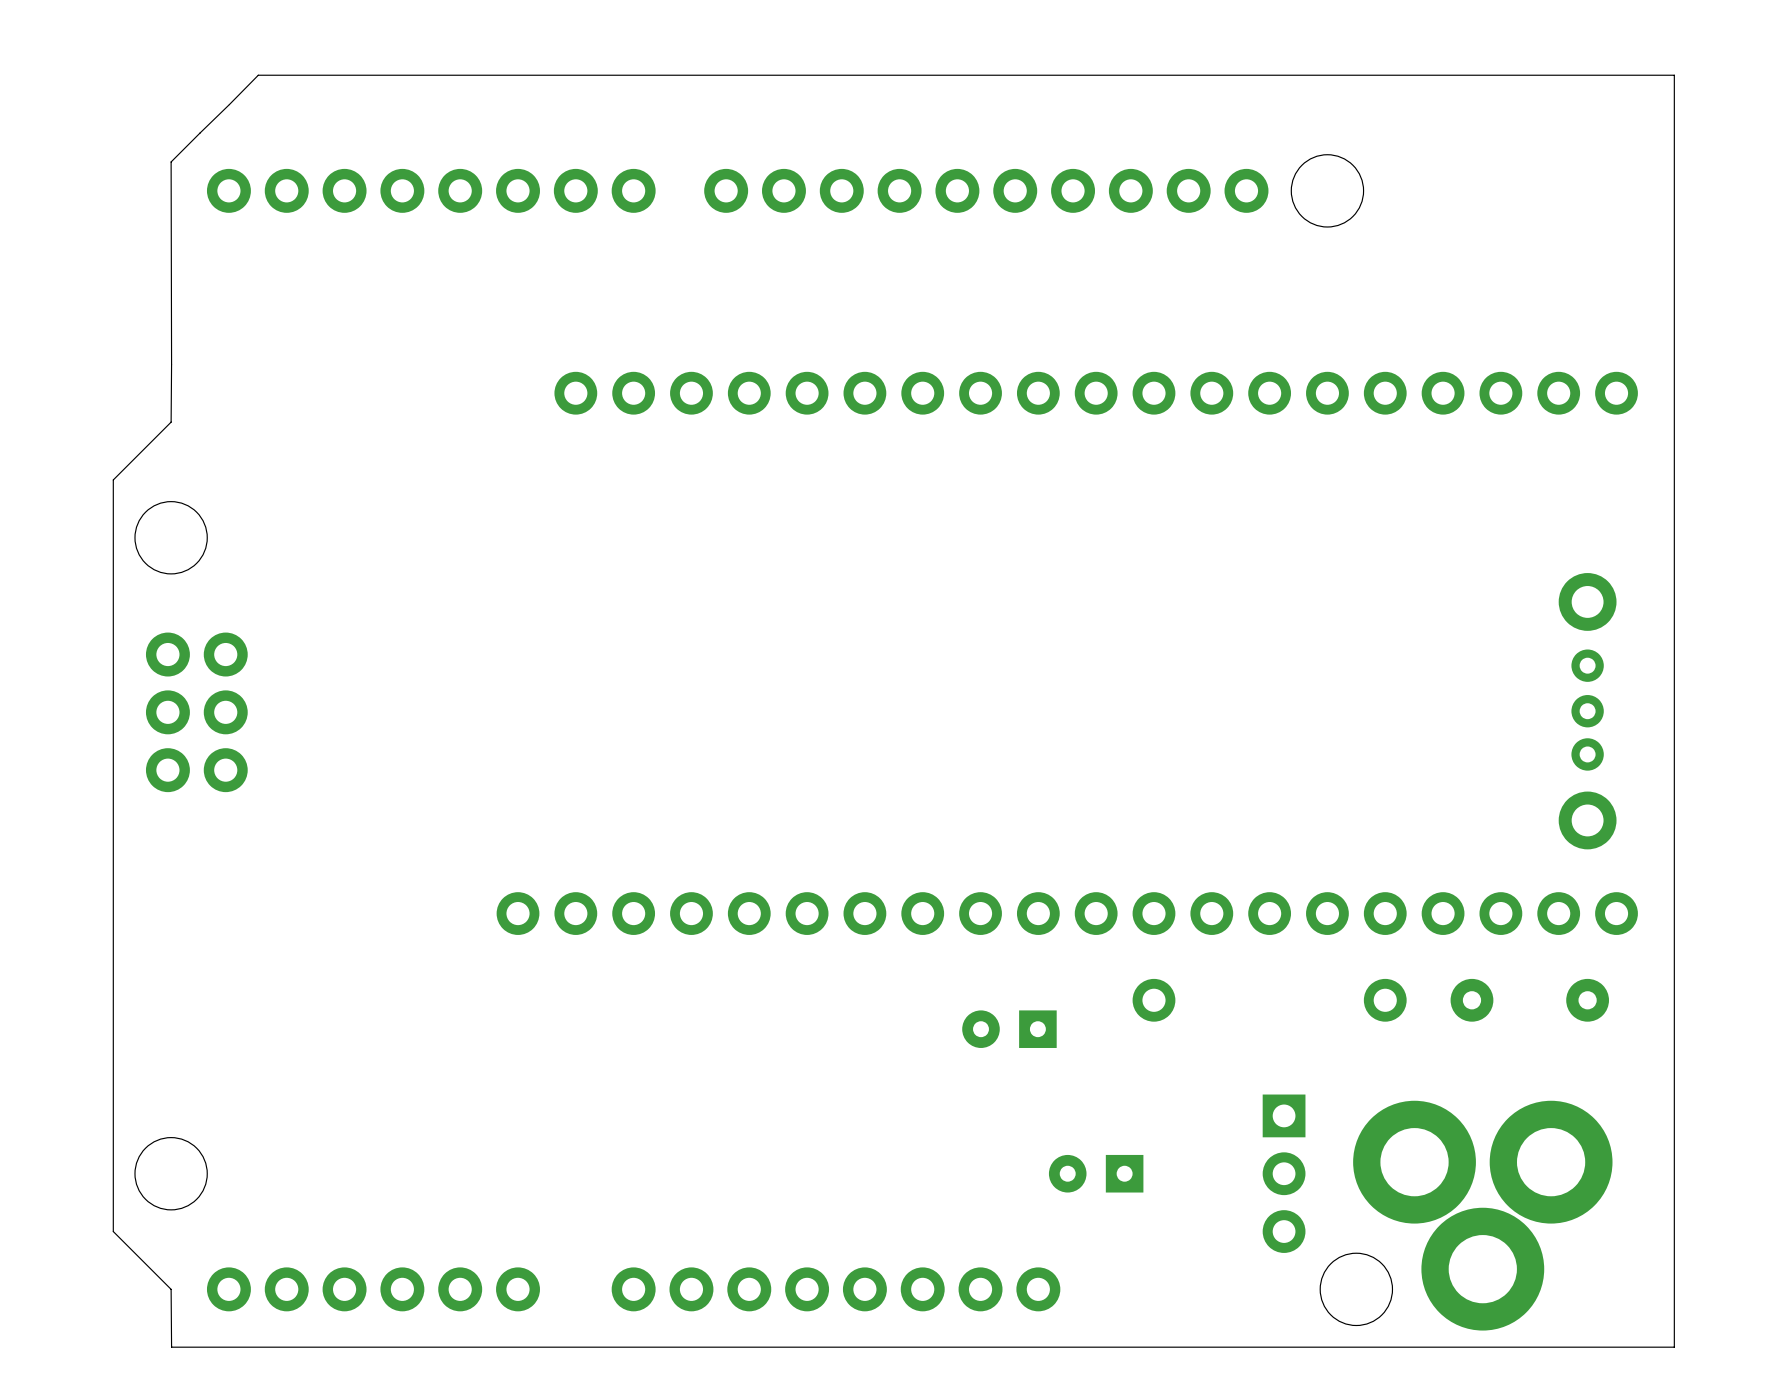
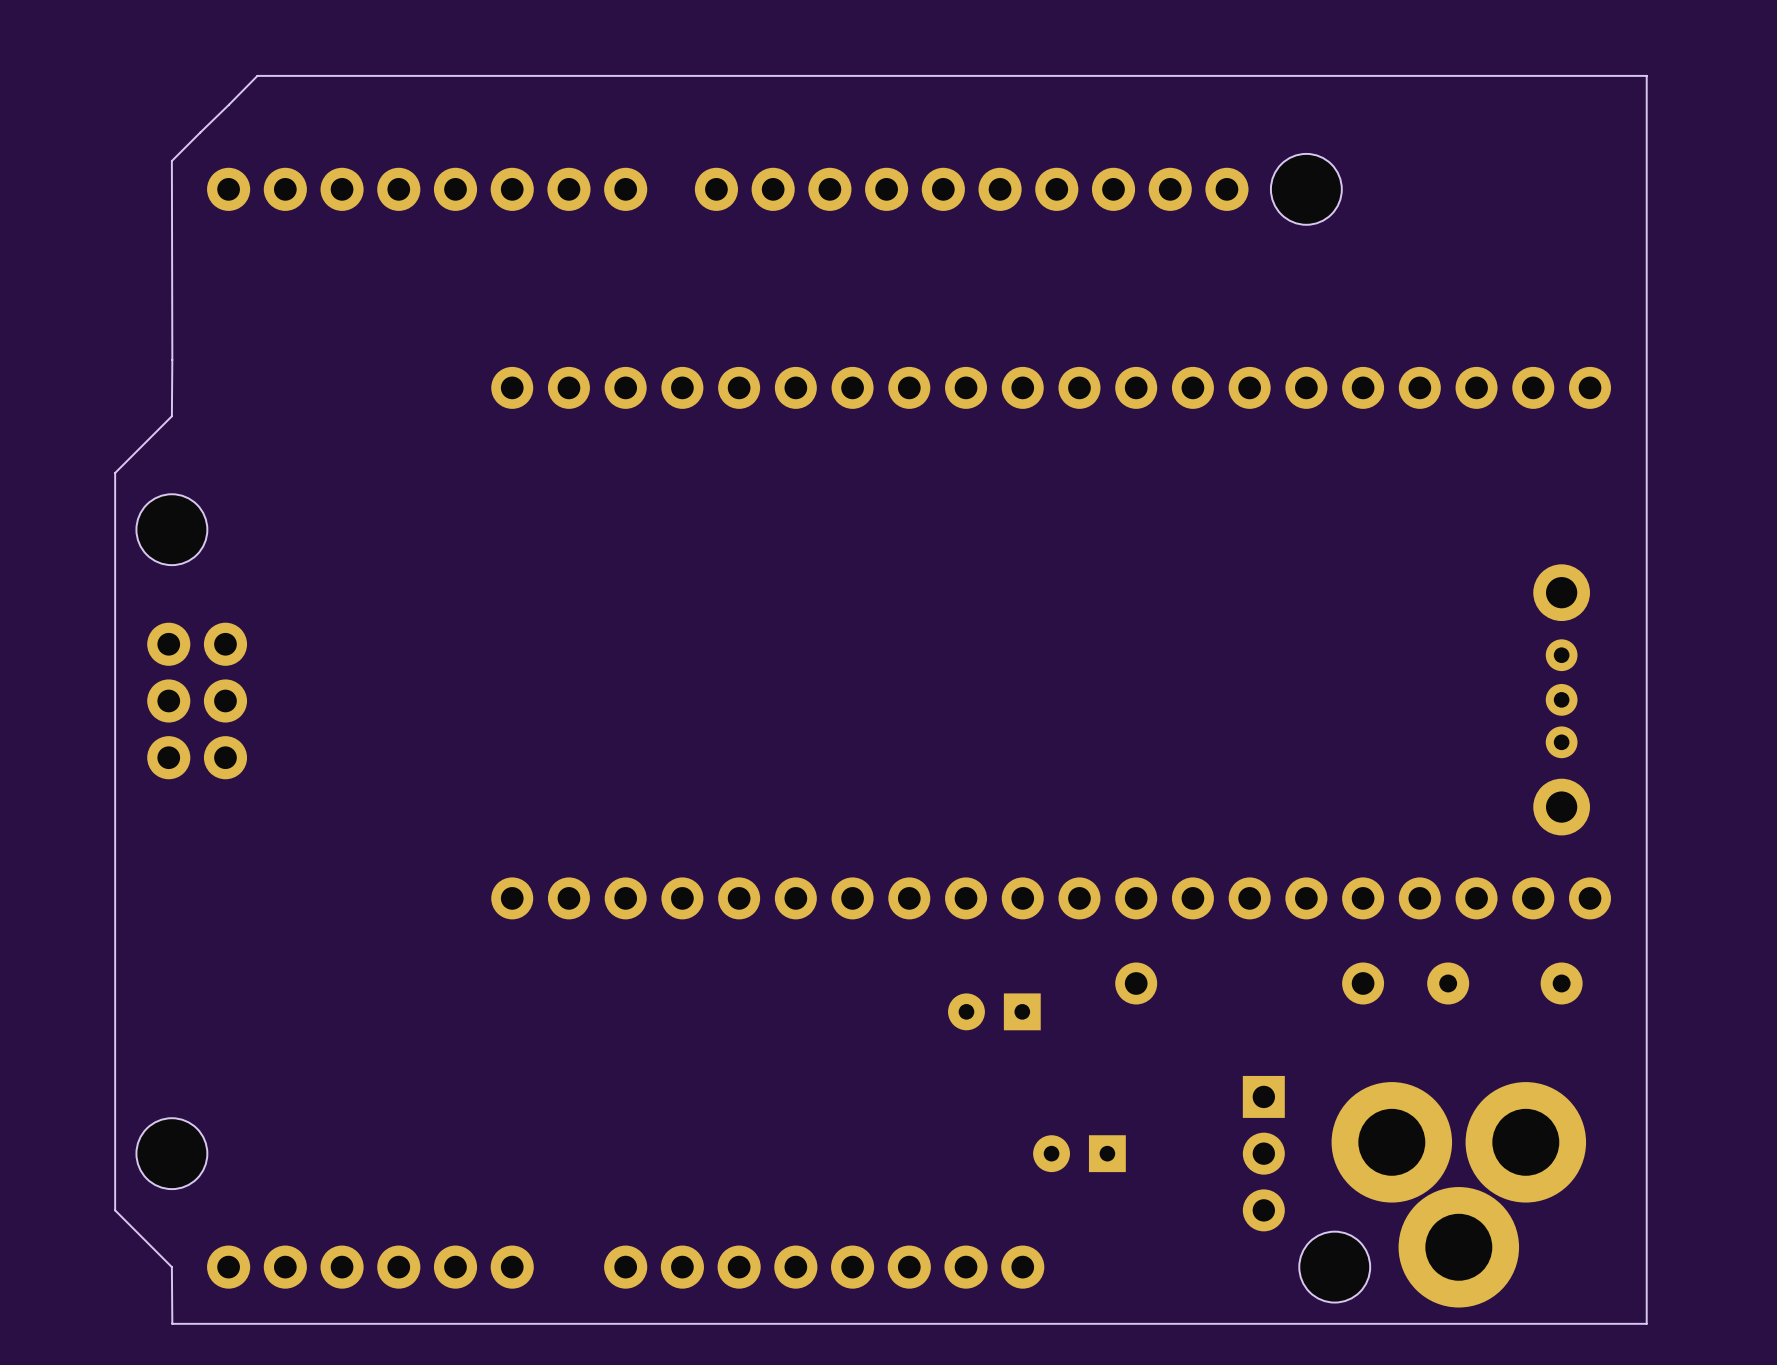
part: none -> (1051, 387)

